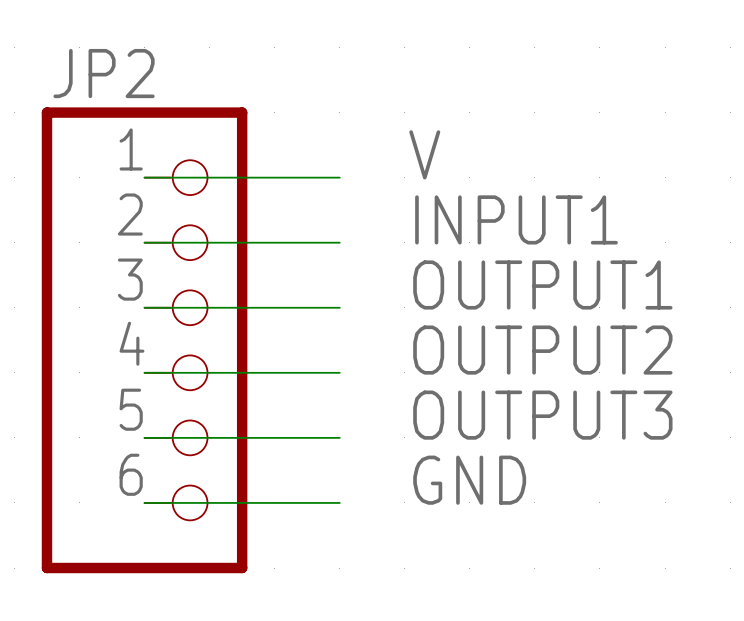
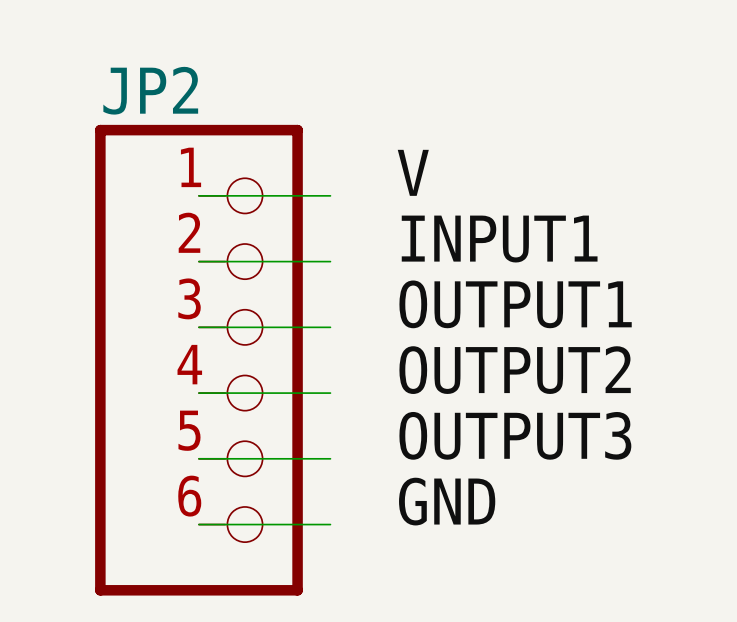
wire: (144, 177) (209, 177) -> none
wire: (144, 242) (209, 242) -> none
wire: (144, 307) (209, 307) -> none
JP2 position: (144, 340) -> (198, 360)
wire: (144, 372) (209, 372) -> none
wire: (144, 437) (209, 437) -> none
wire: (144, 502) (209, 502) -> none

